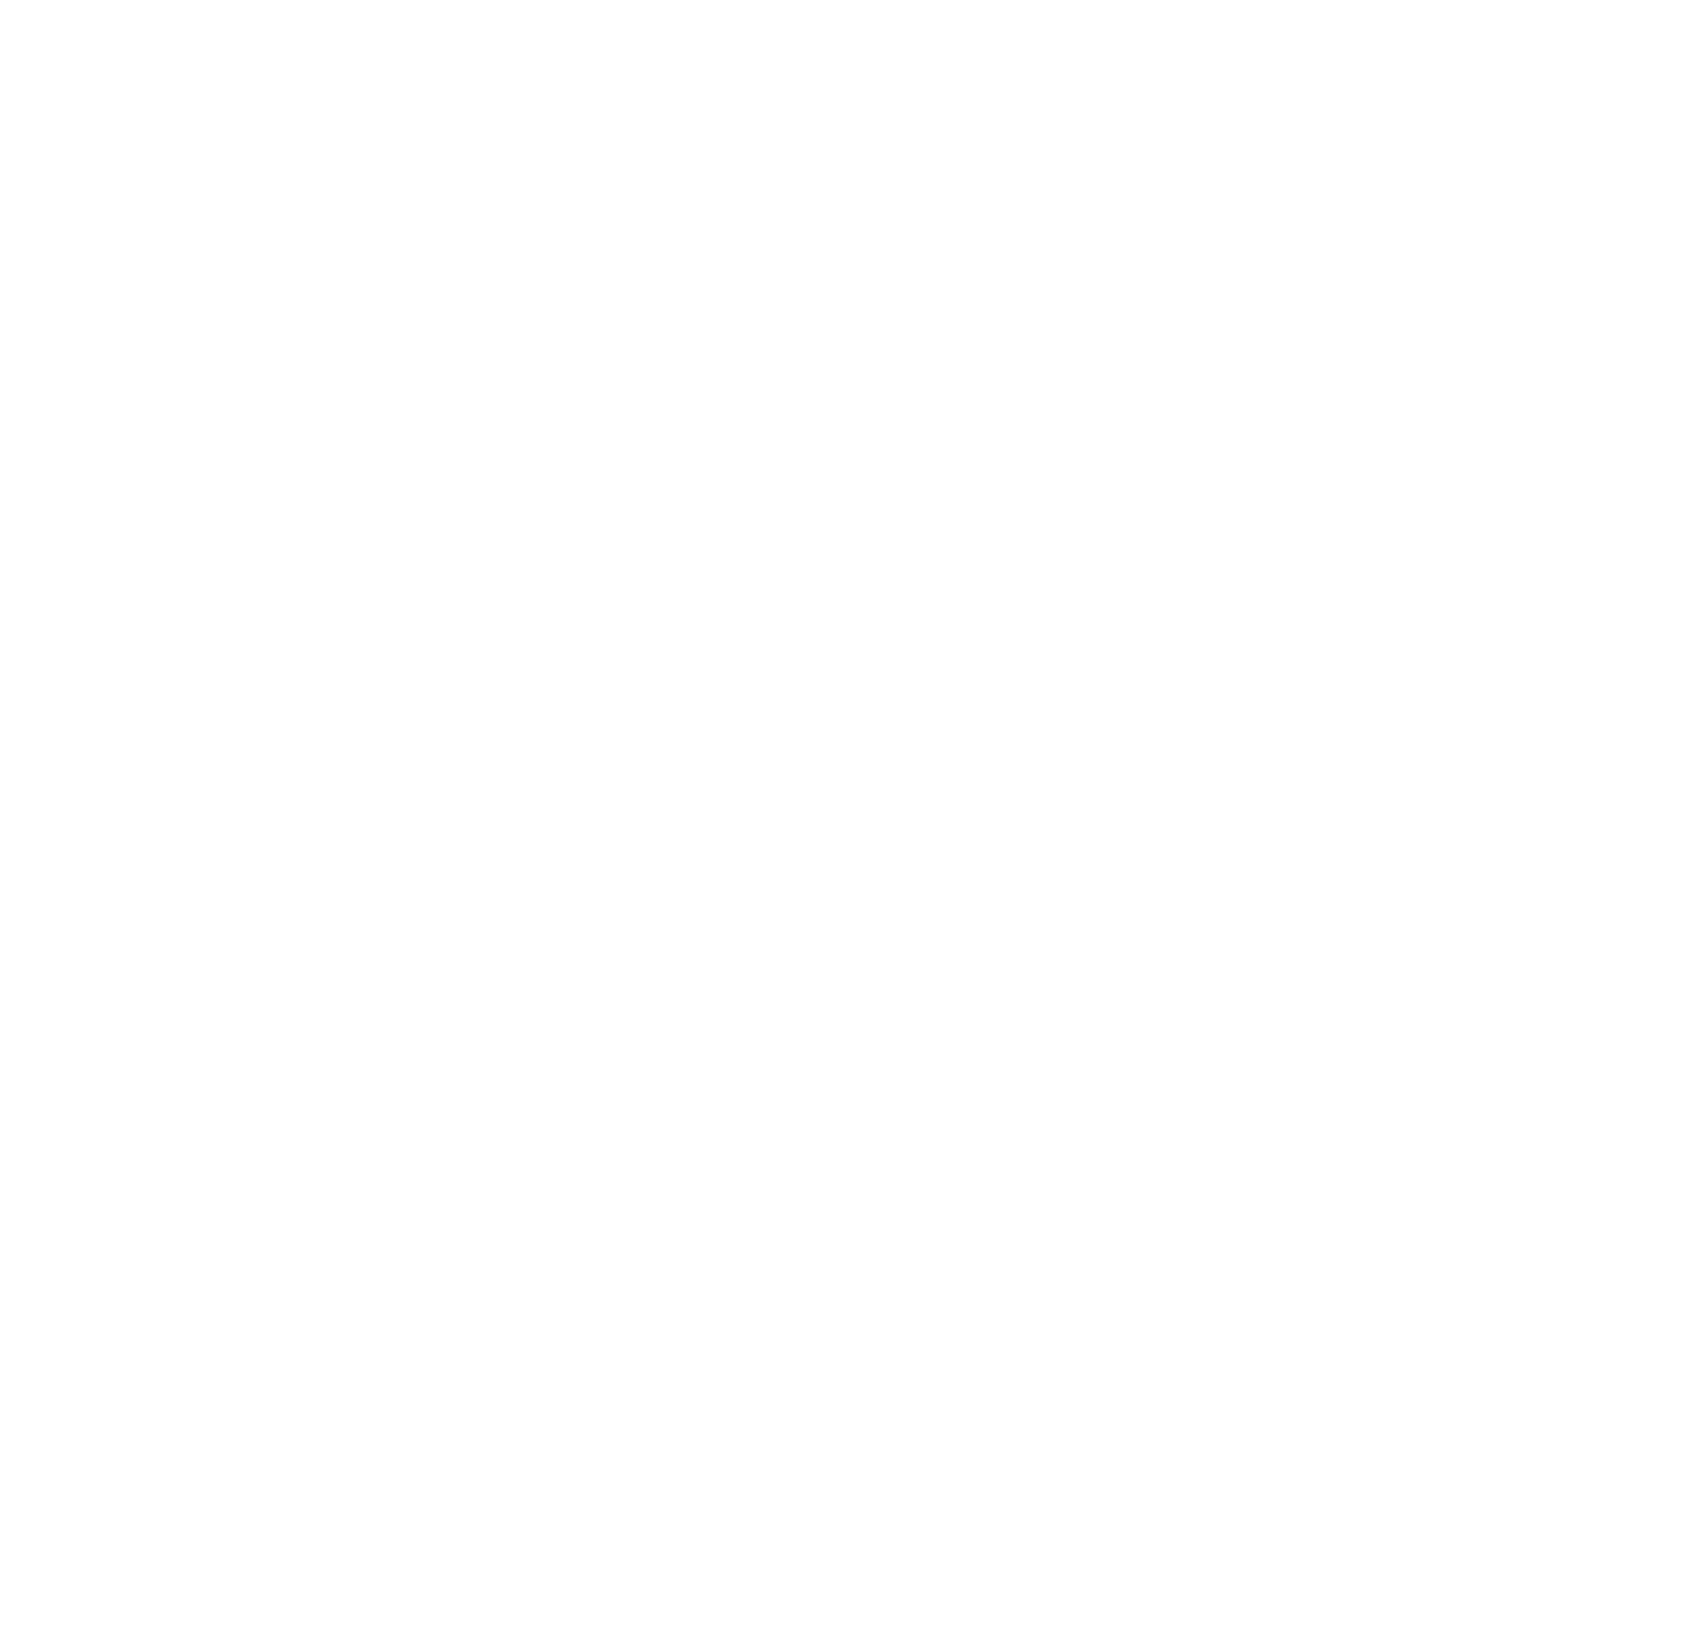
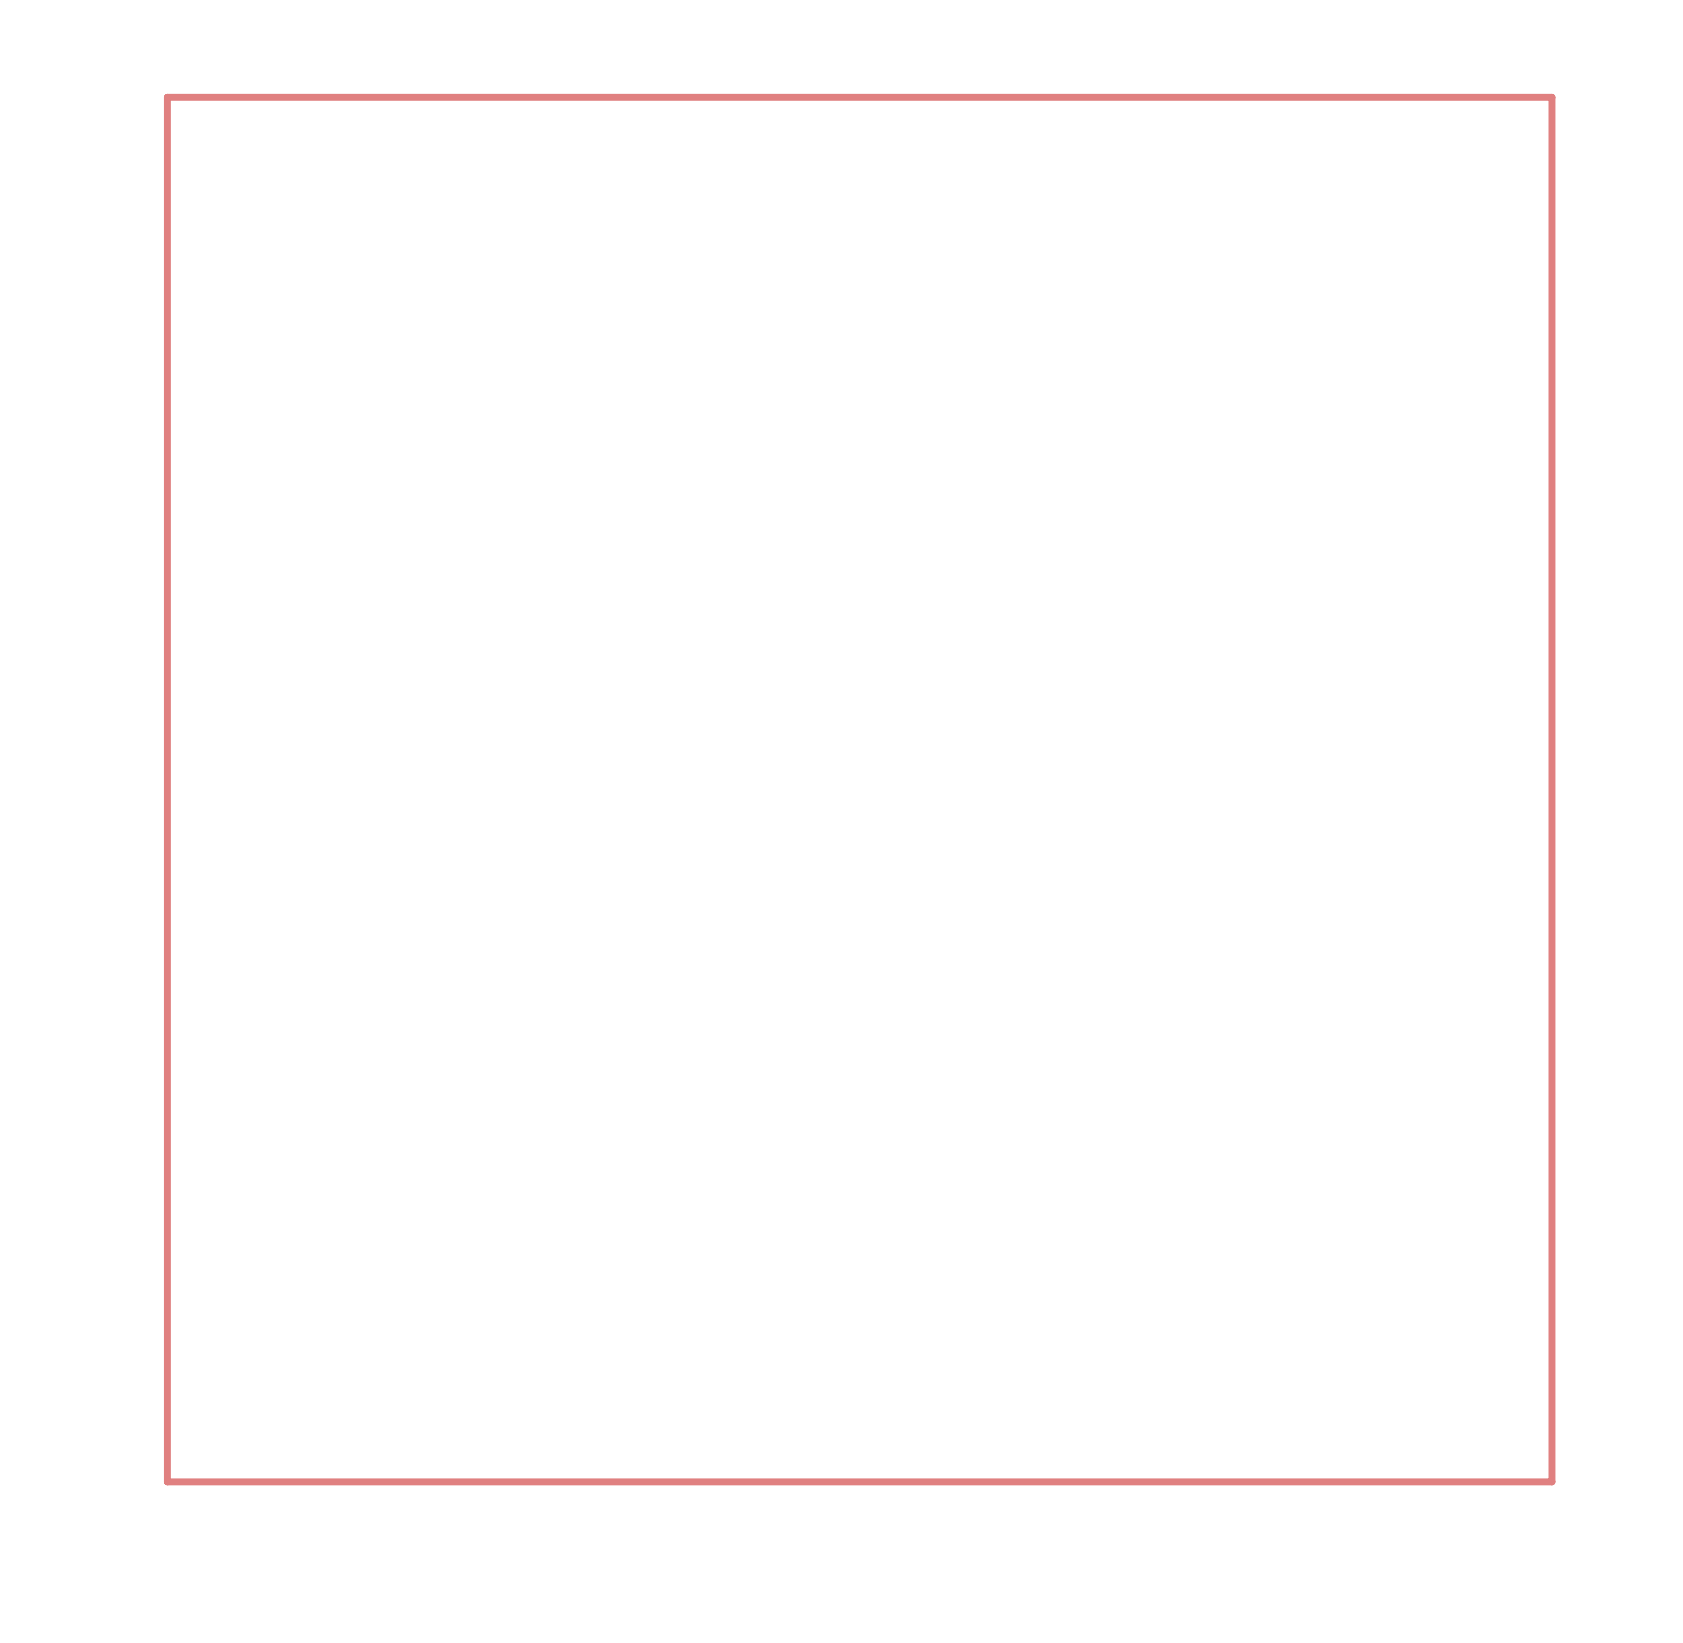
top track: none -> (167, 97) (1551, 97) (1551, 1481) (167, 1481) (167, 97)

